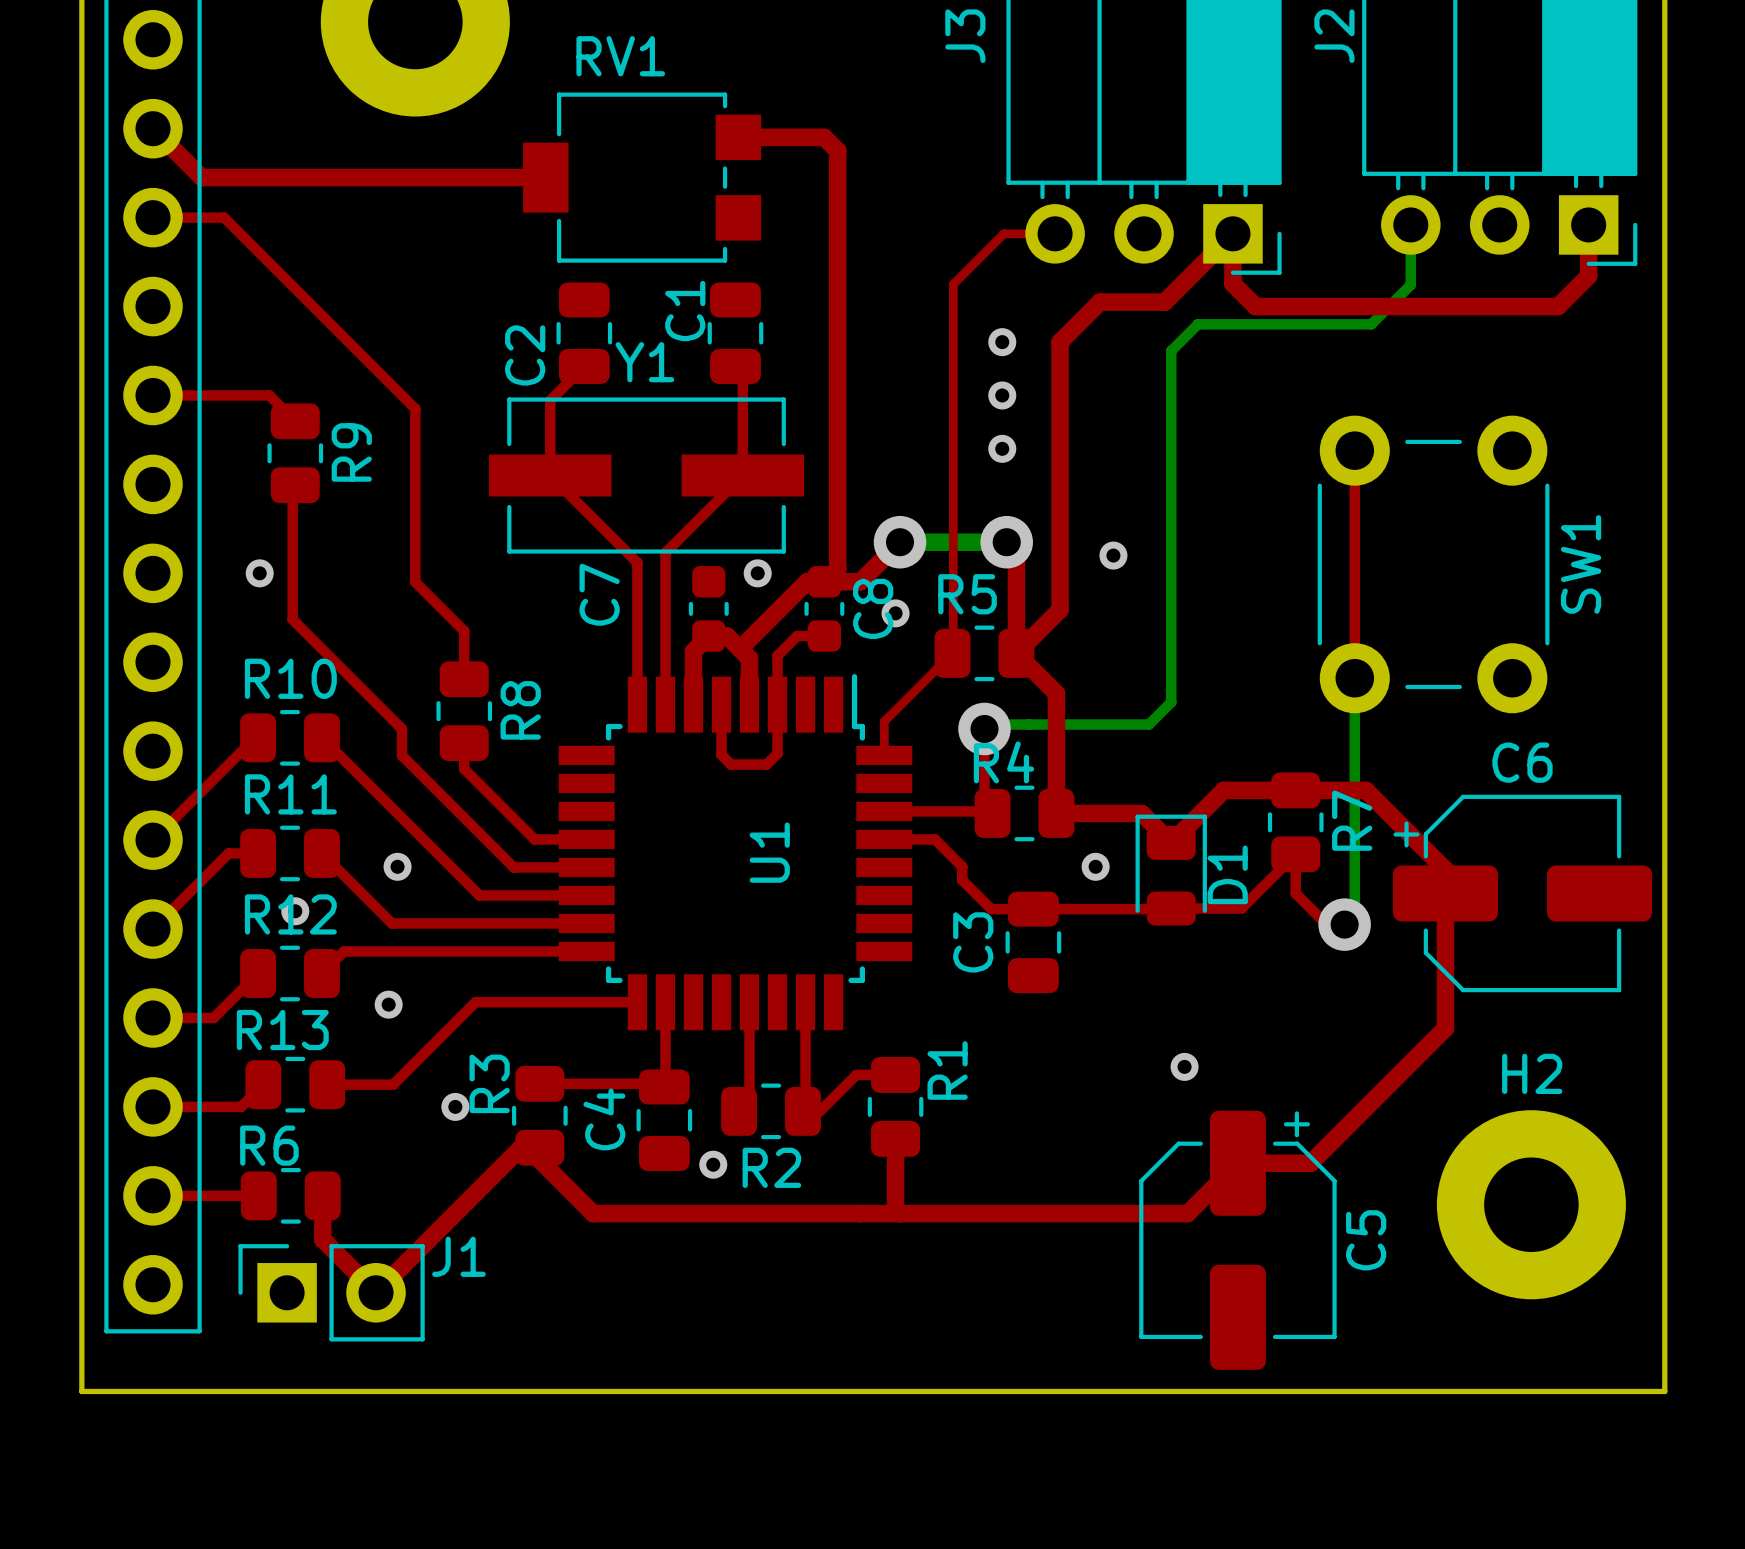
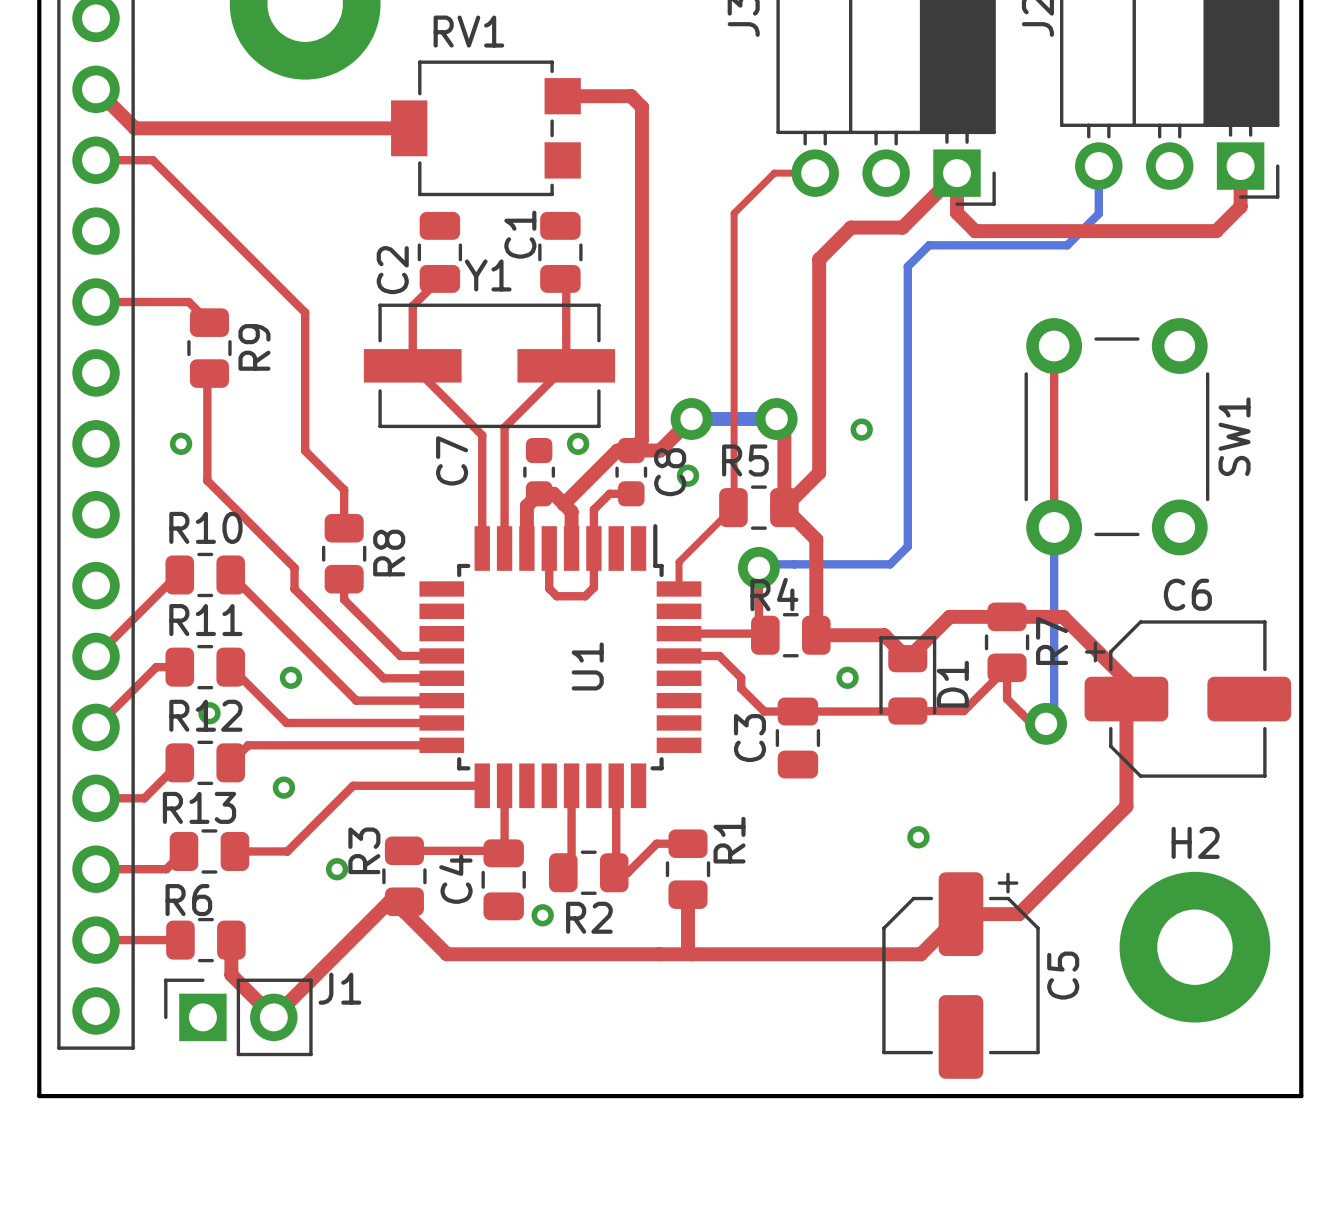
via: (1002, 342) -> none
via: (1002, 395) -> none
via: (1002, 448) -> none

